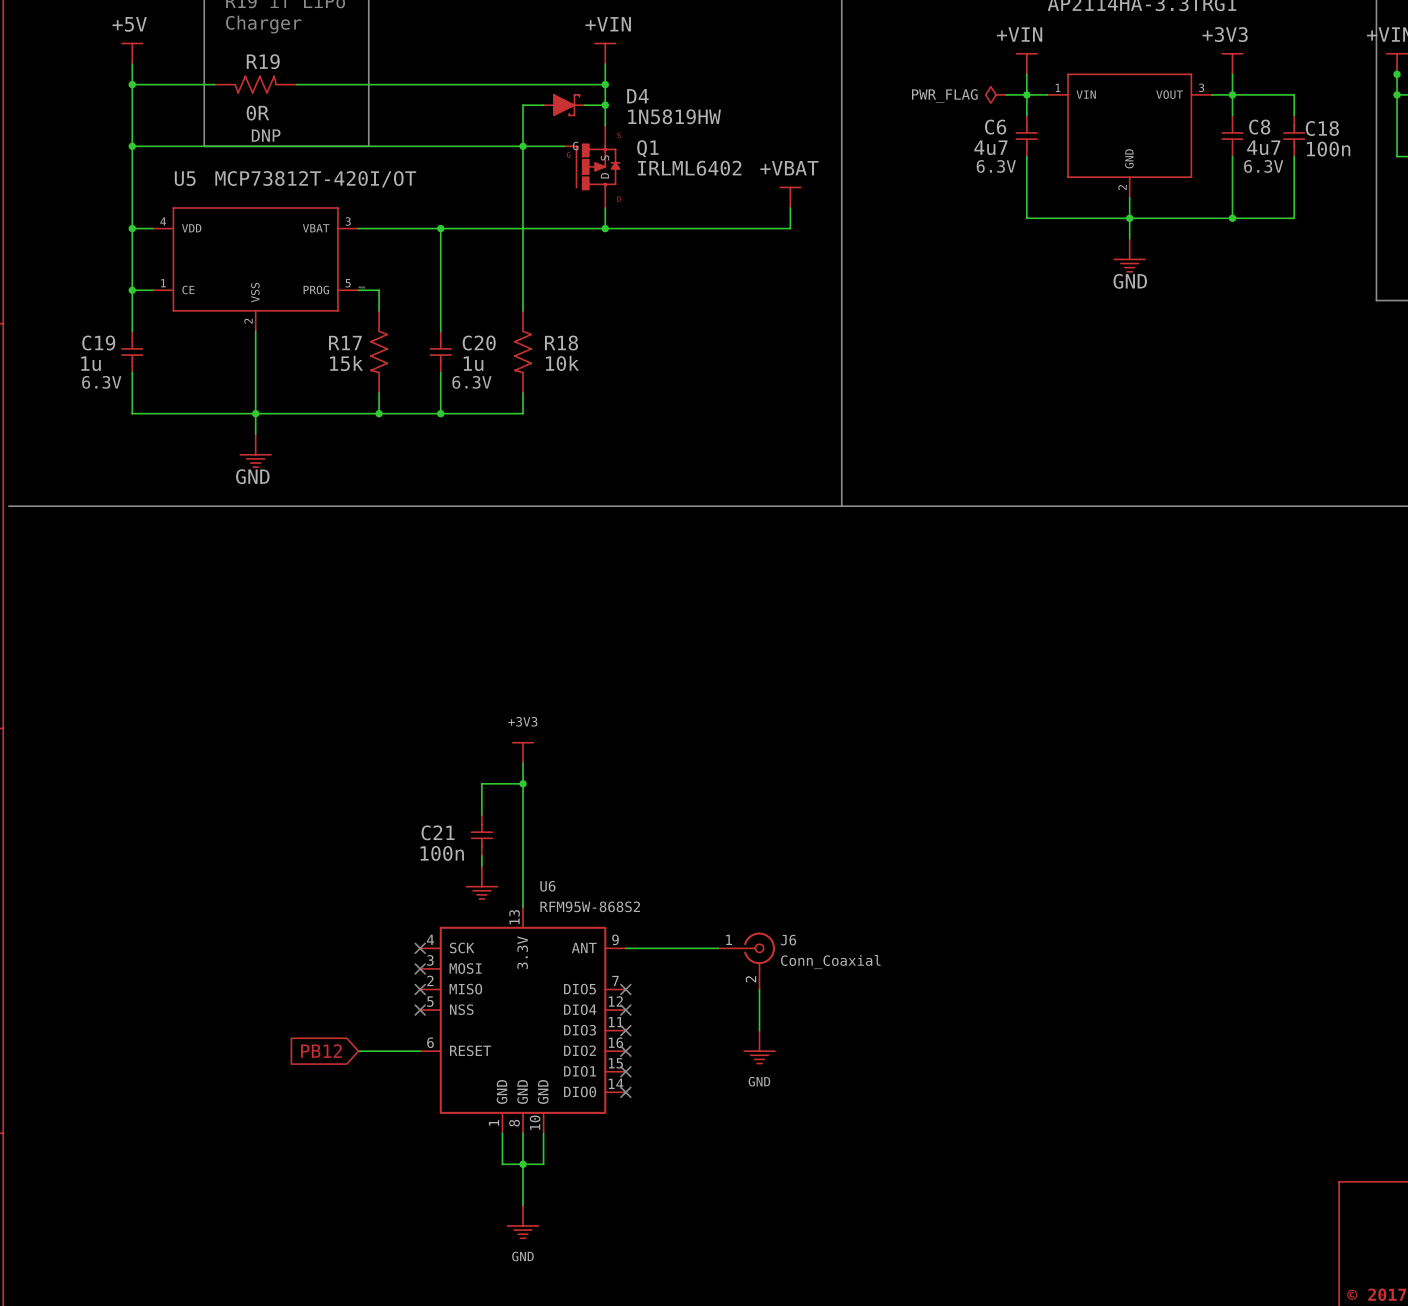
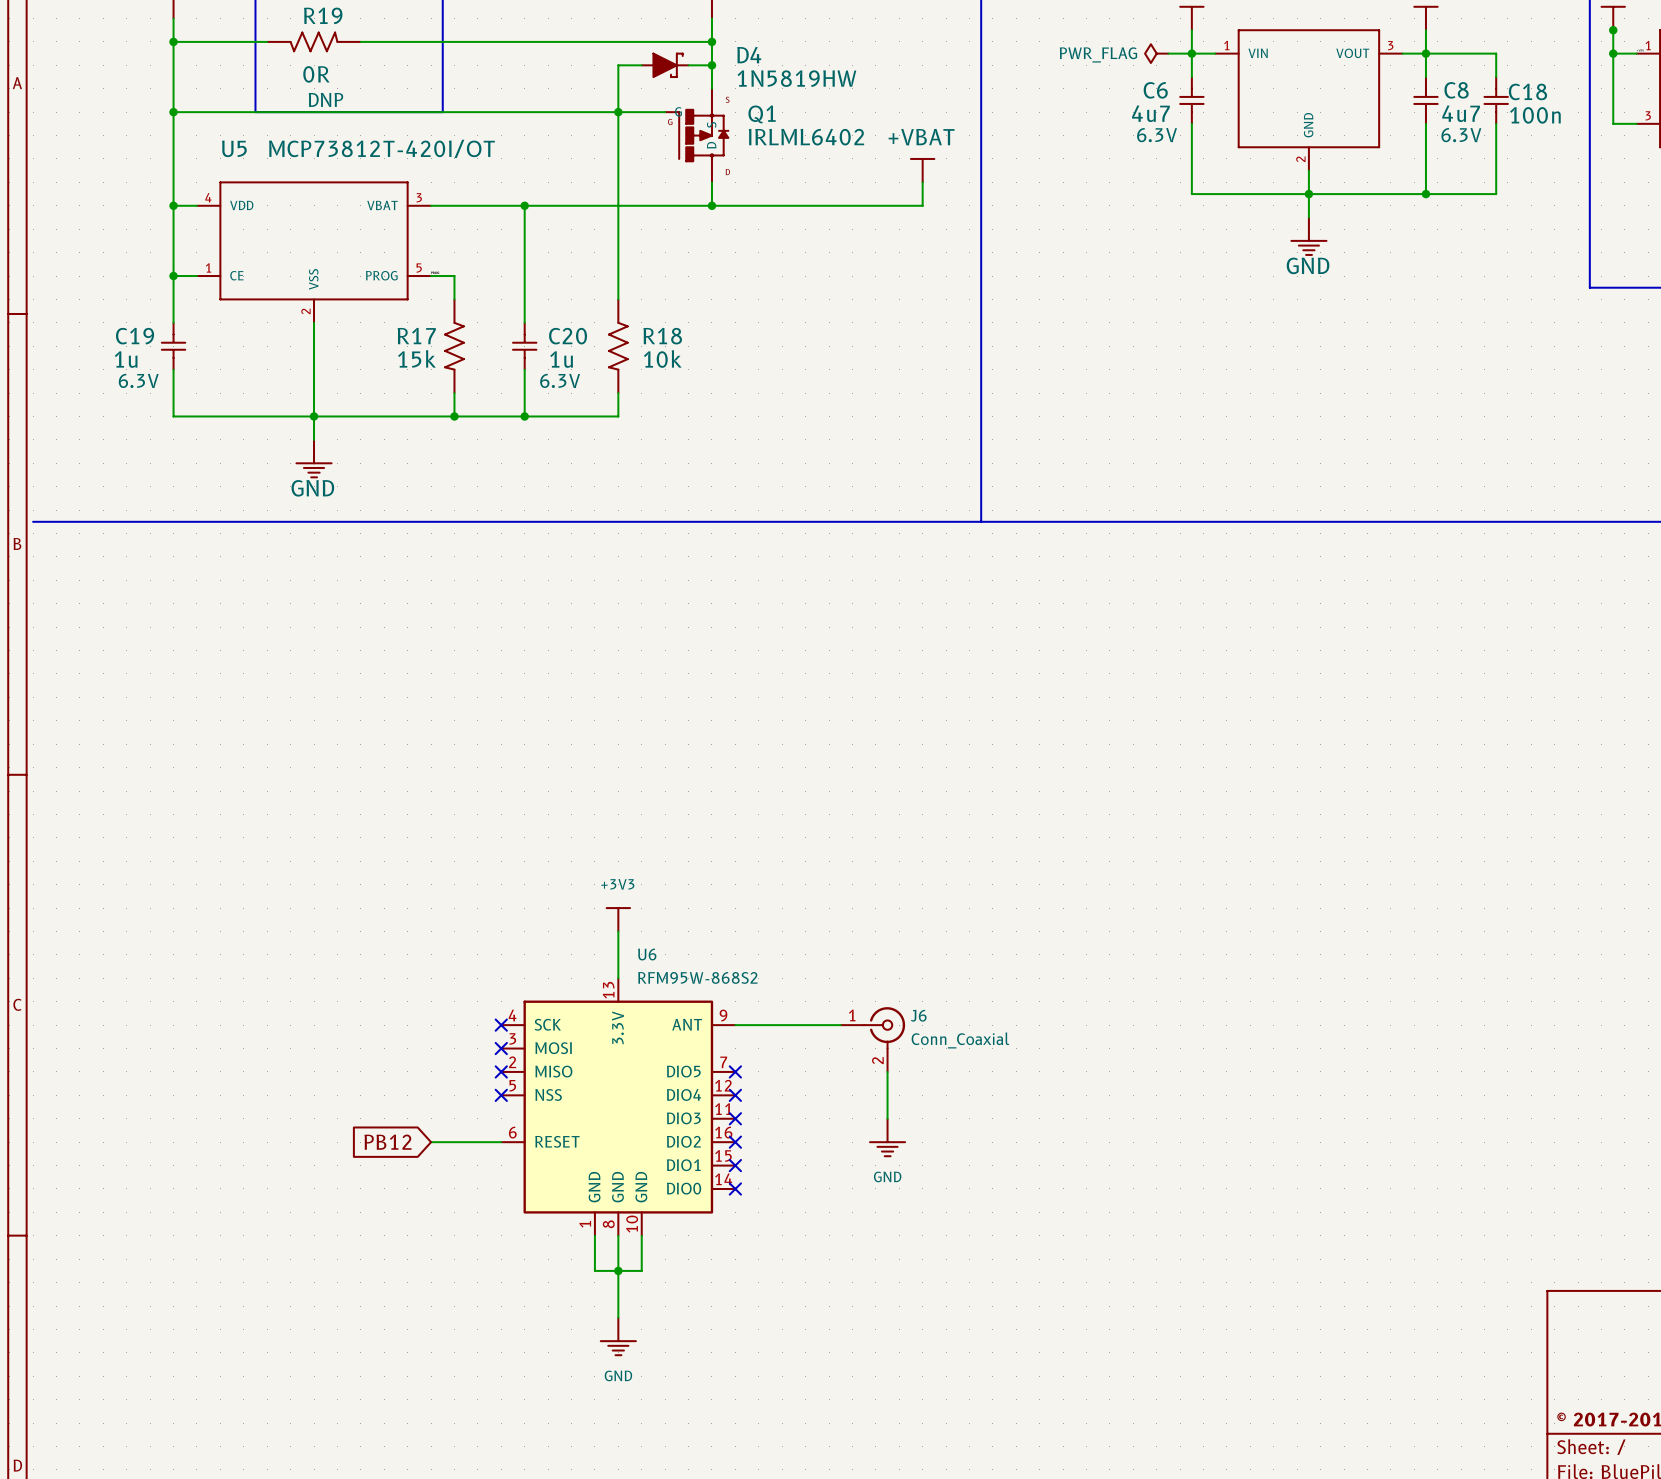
power symbol position: +3V3 (523, 752) -> +3V3 (618, 919)
wire: (523, 763) (523, 866) -> none
wire: (523, 783) (481, 783) (481, 814) -> none
junction: (523, 783) -> none
C21: 100n (481, 835) -> none
wire: (481, 855) (481, 866) -> none
power symbol: (481, 882) -> none

